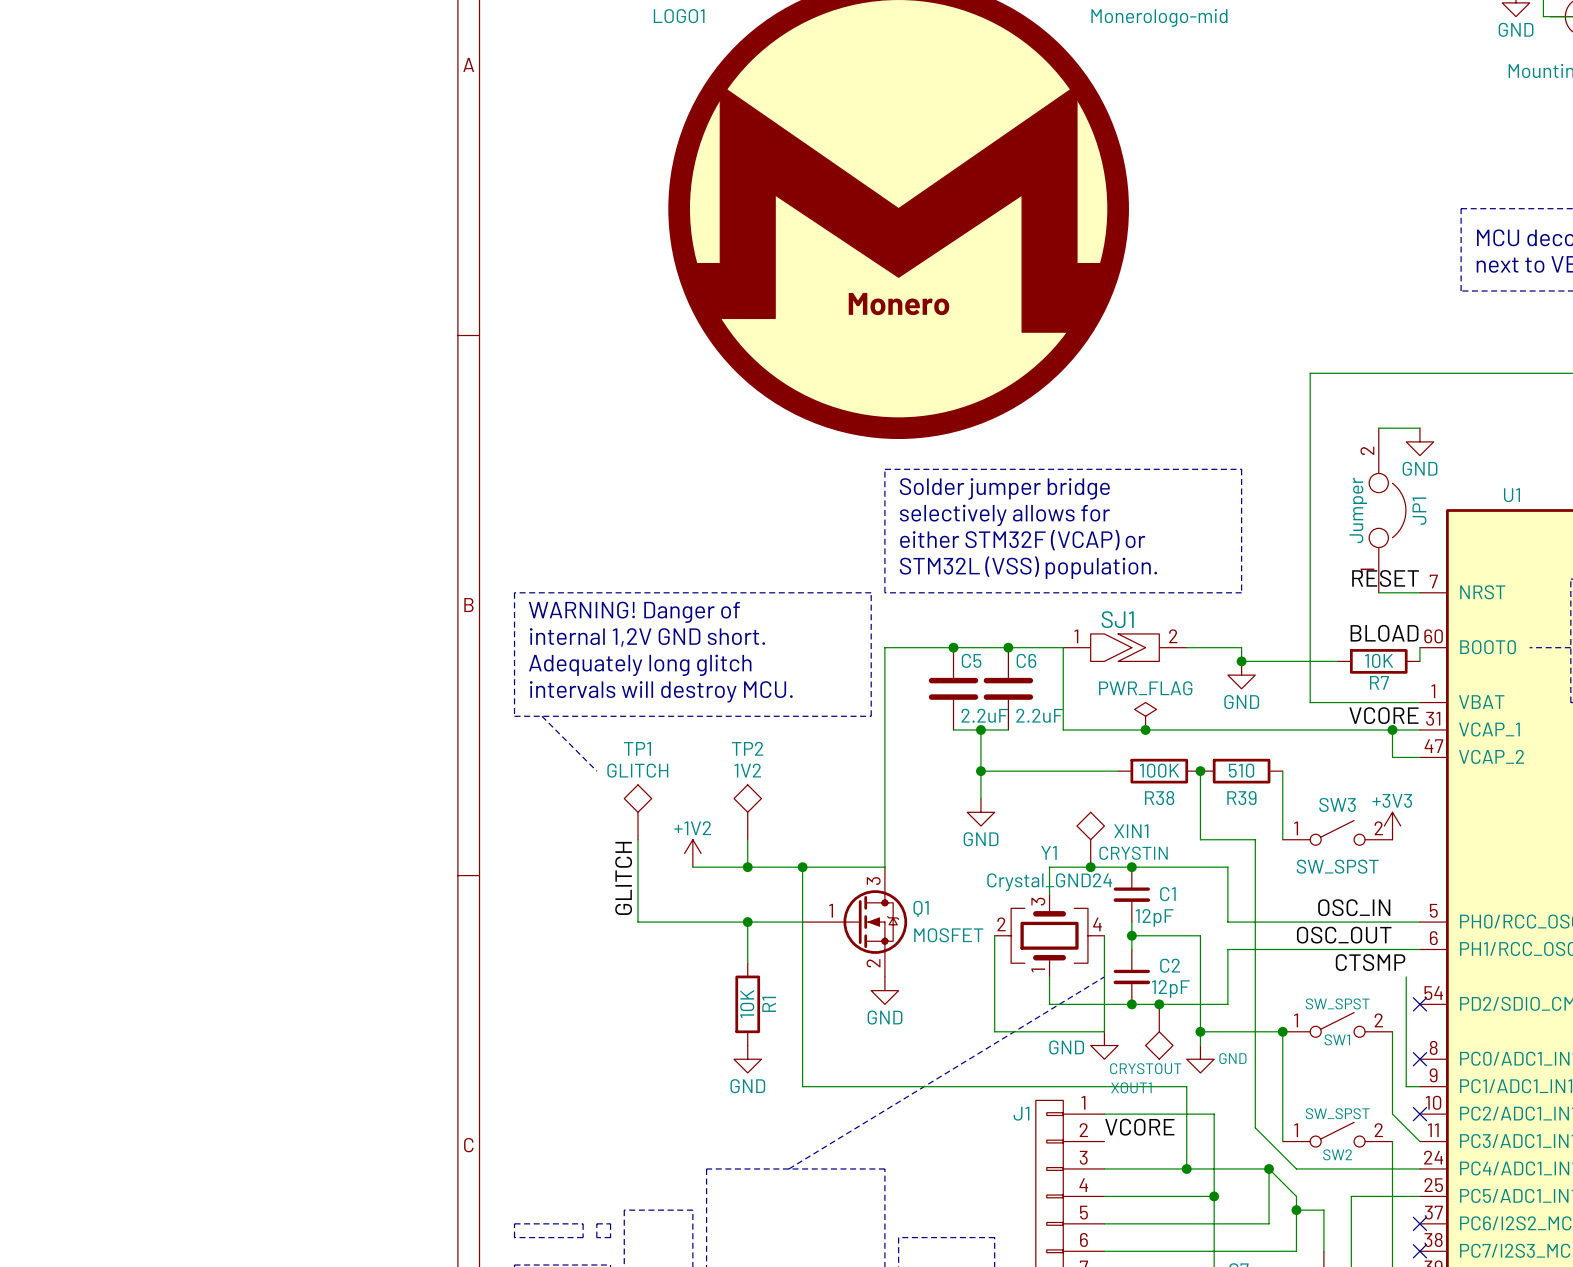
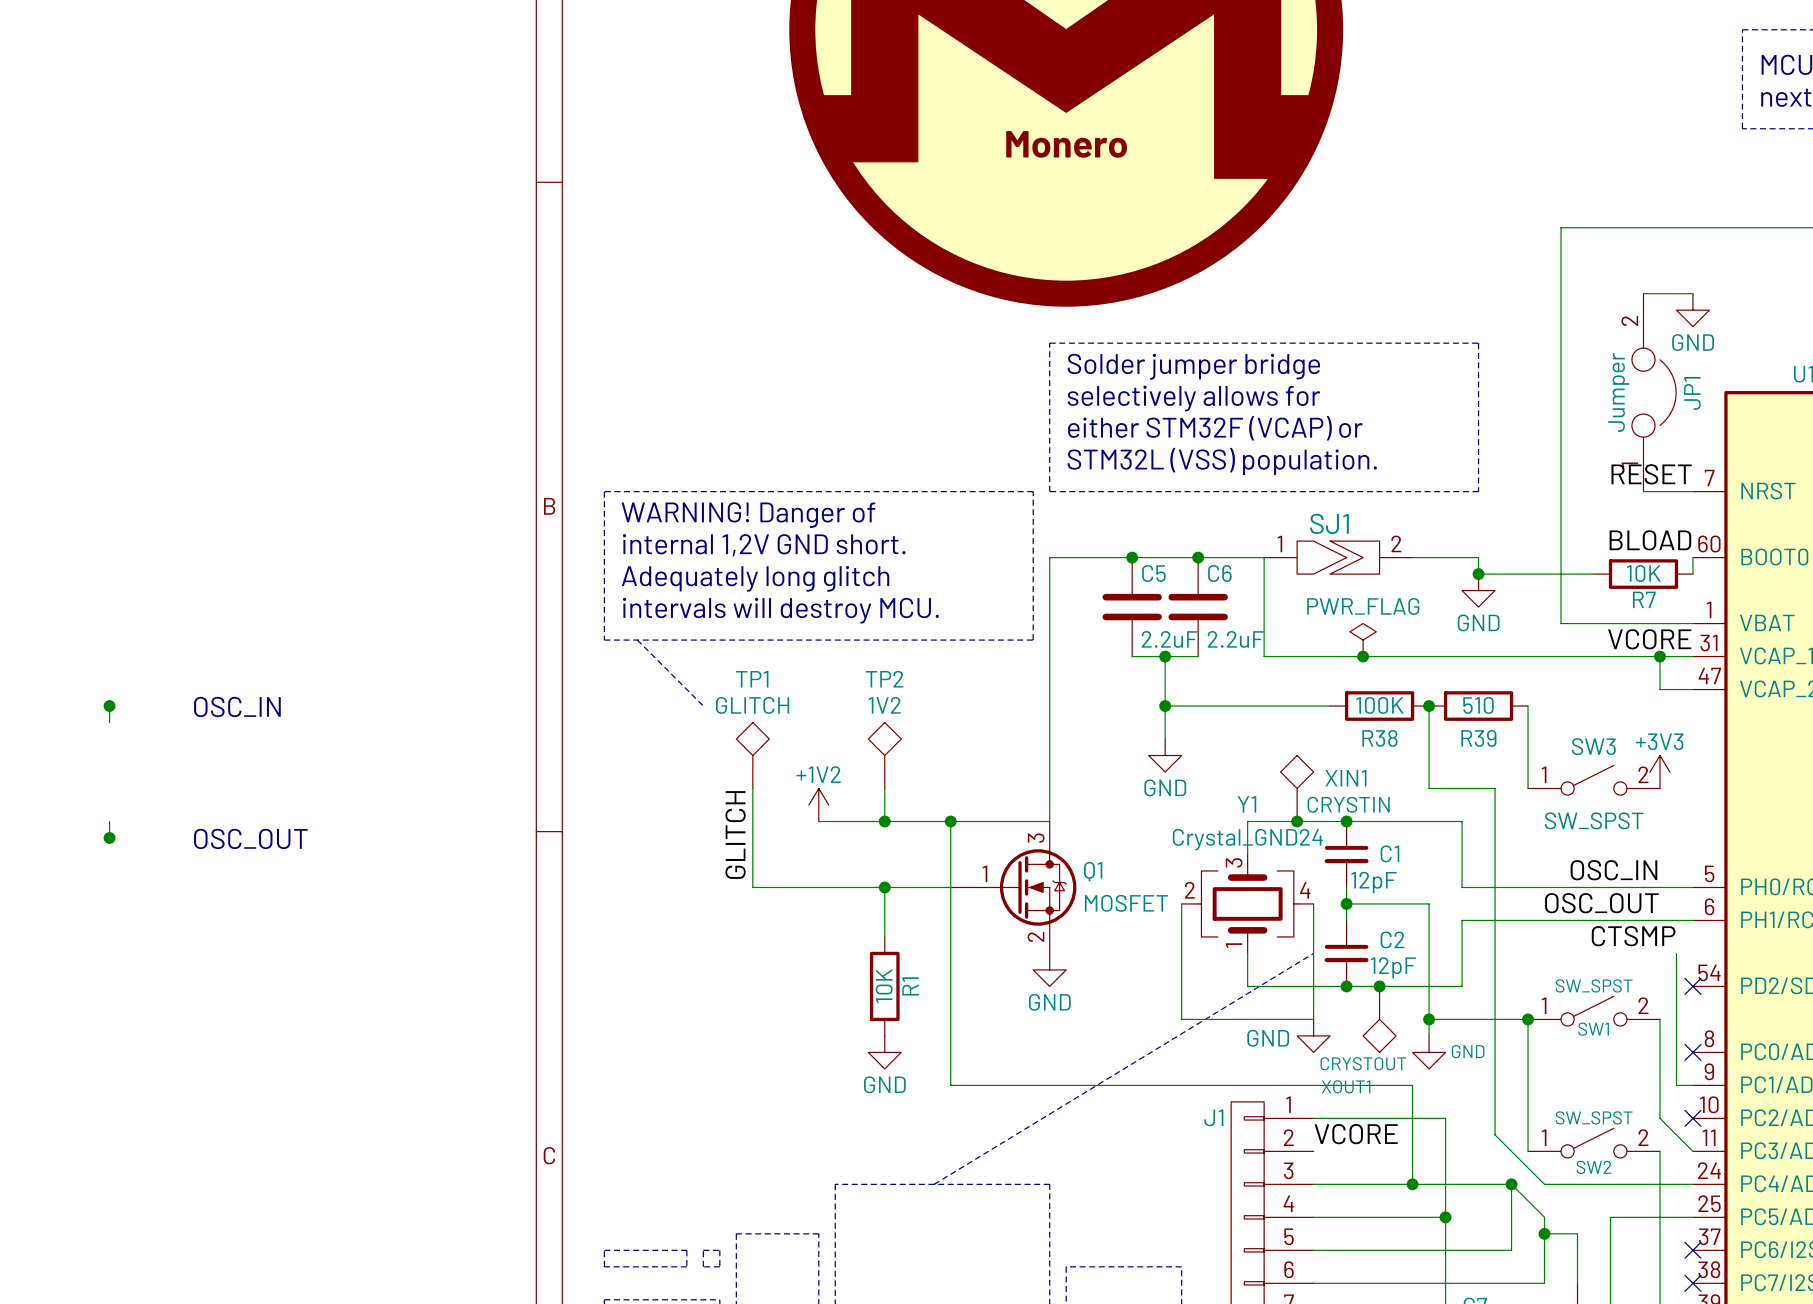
wire: none -> (109, 706) (109, 722)
junction: none -> (109, 706)
text: none -> OSC_IN (237, 706)
wire: none -> (109, 821) (109, 837)
junction: none -> (109, 837)
text: none -> OSC_OUT (250, 838)

